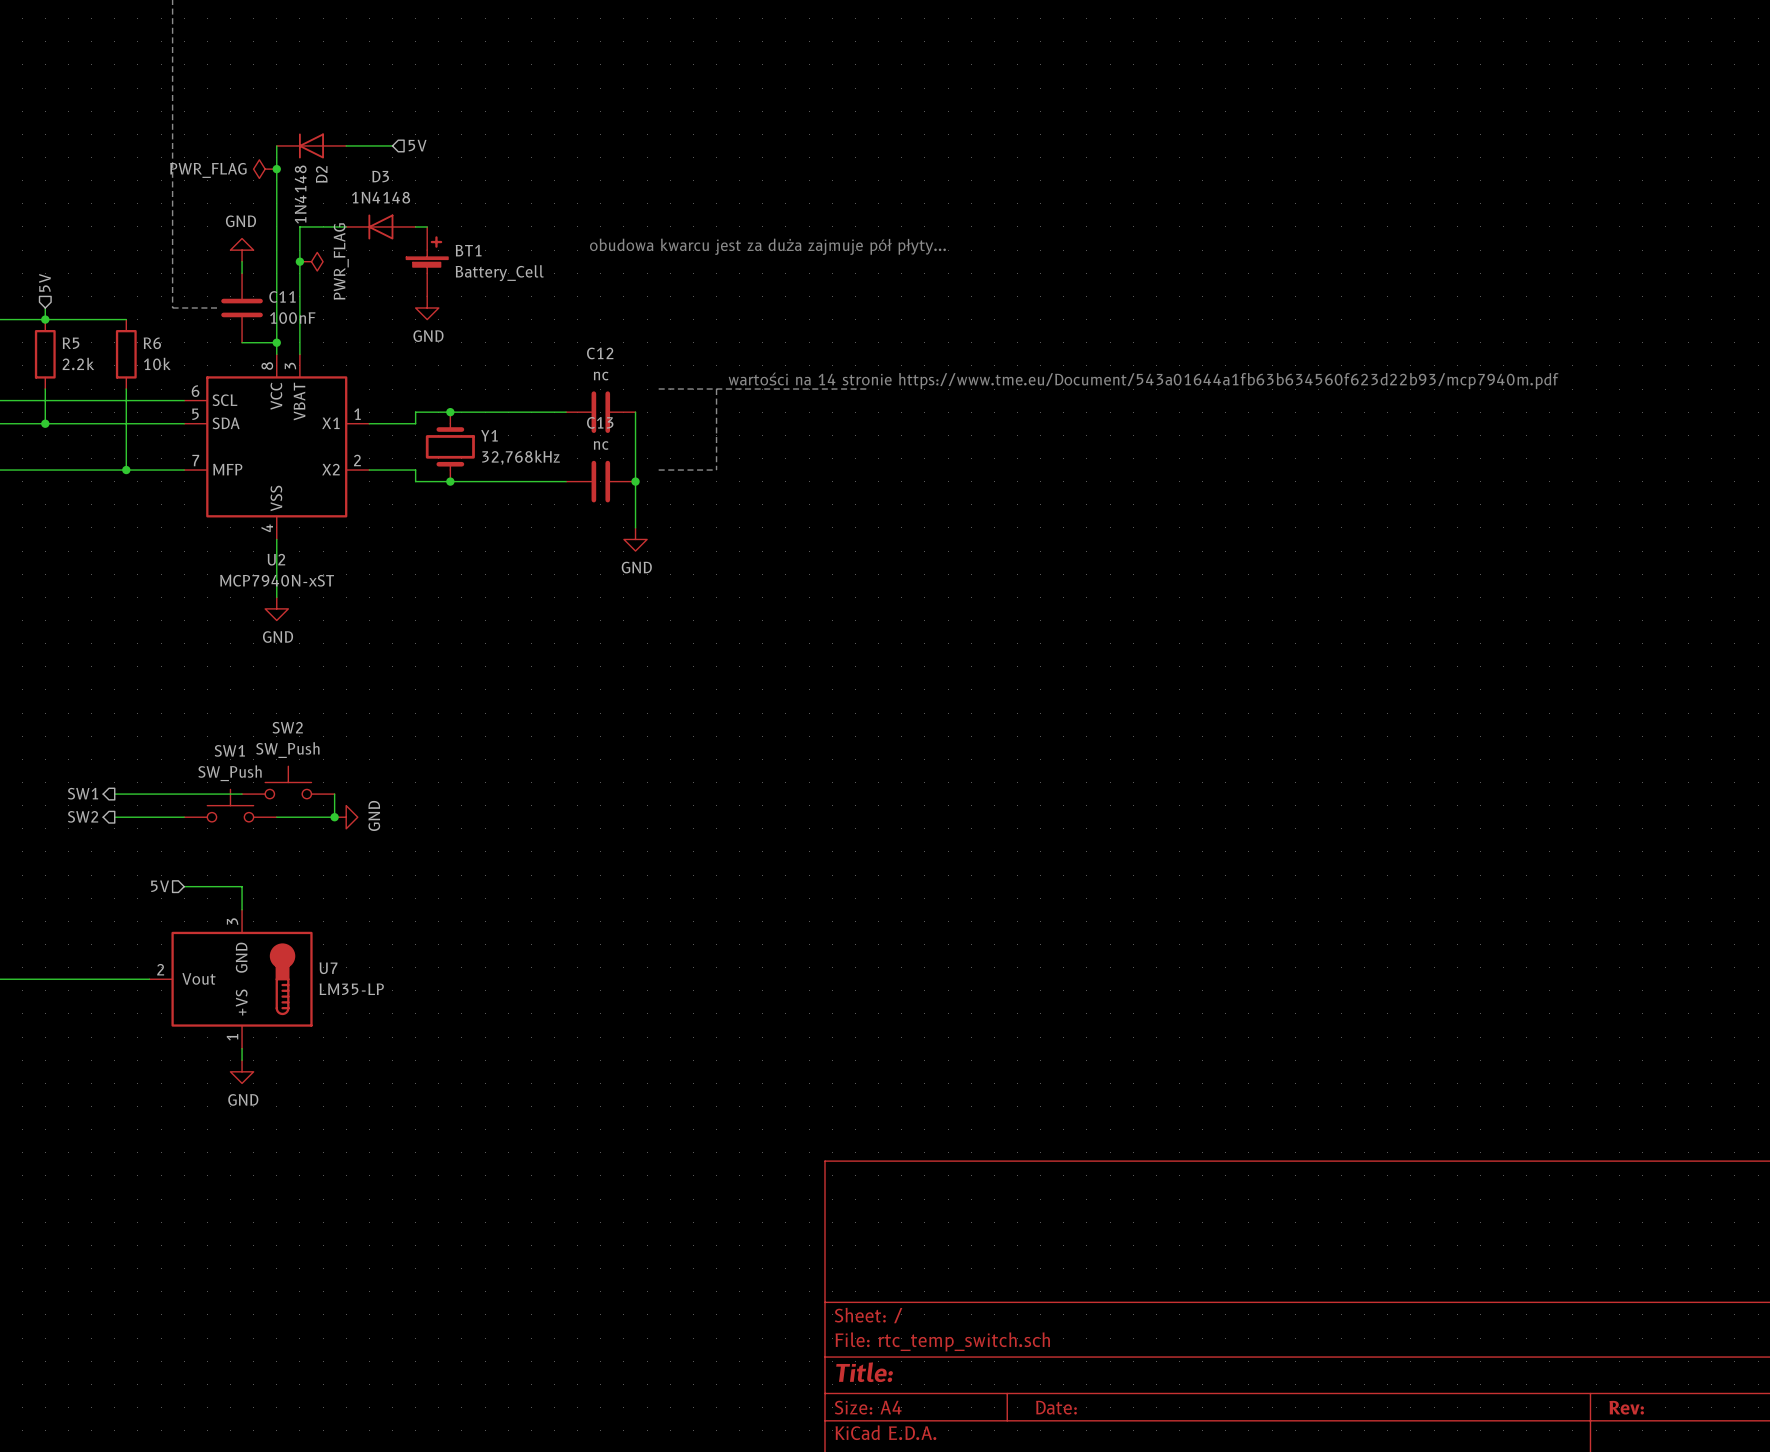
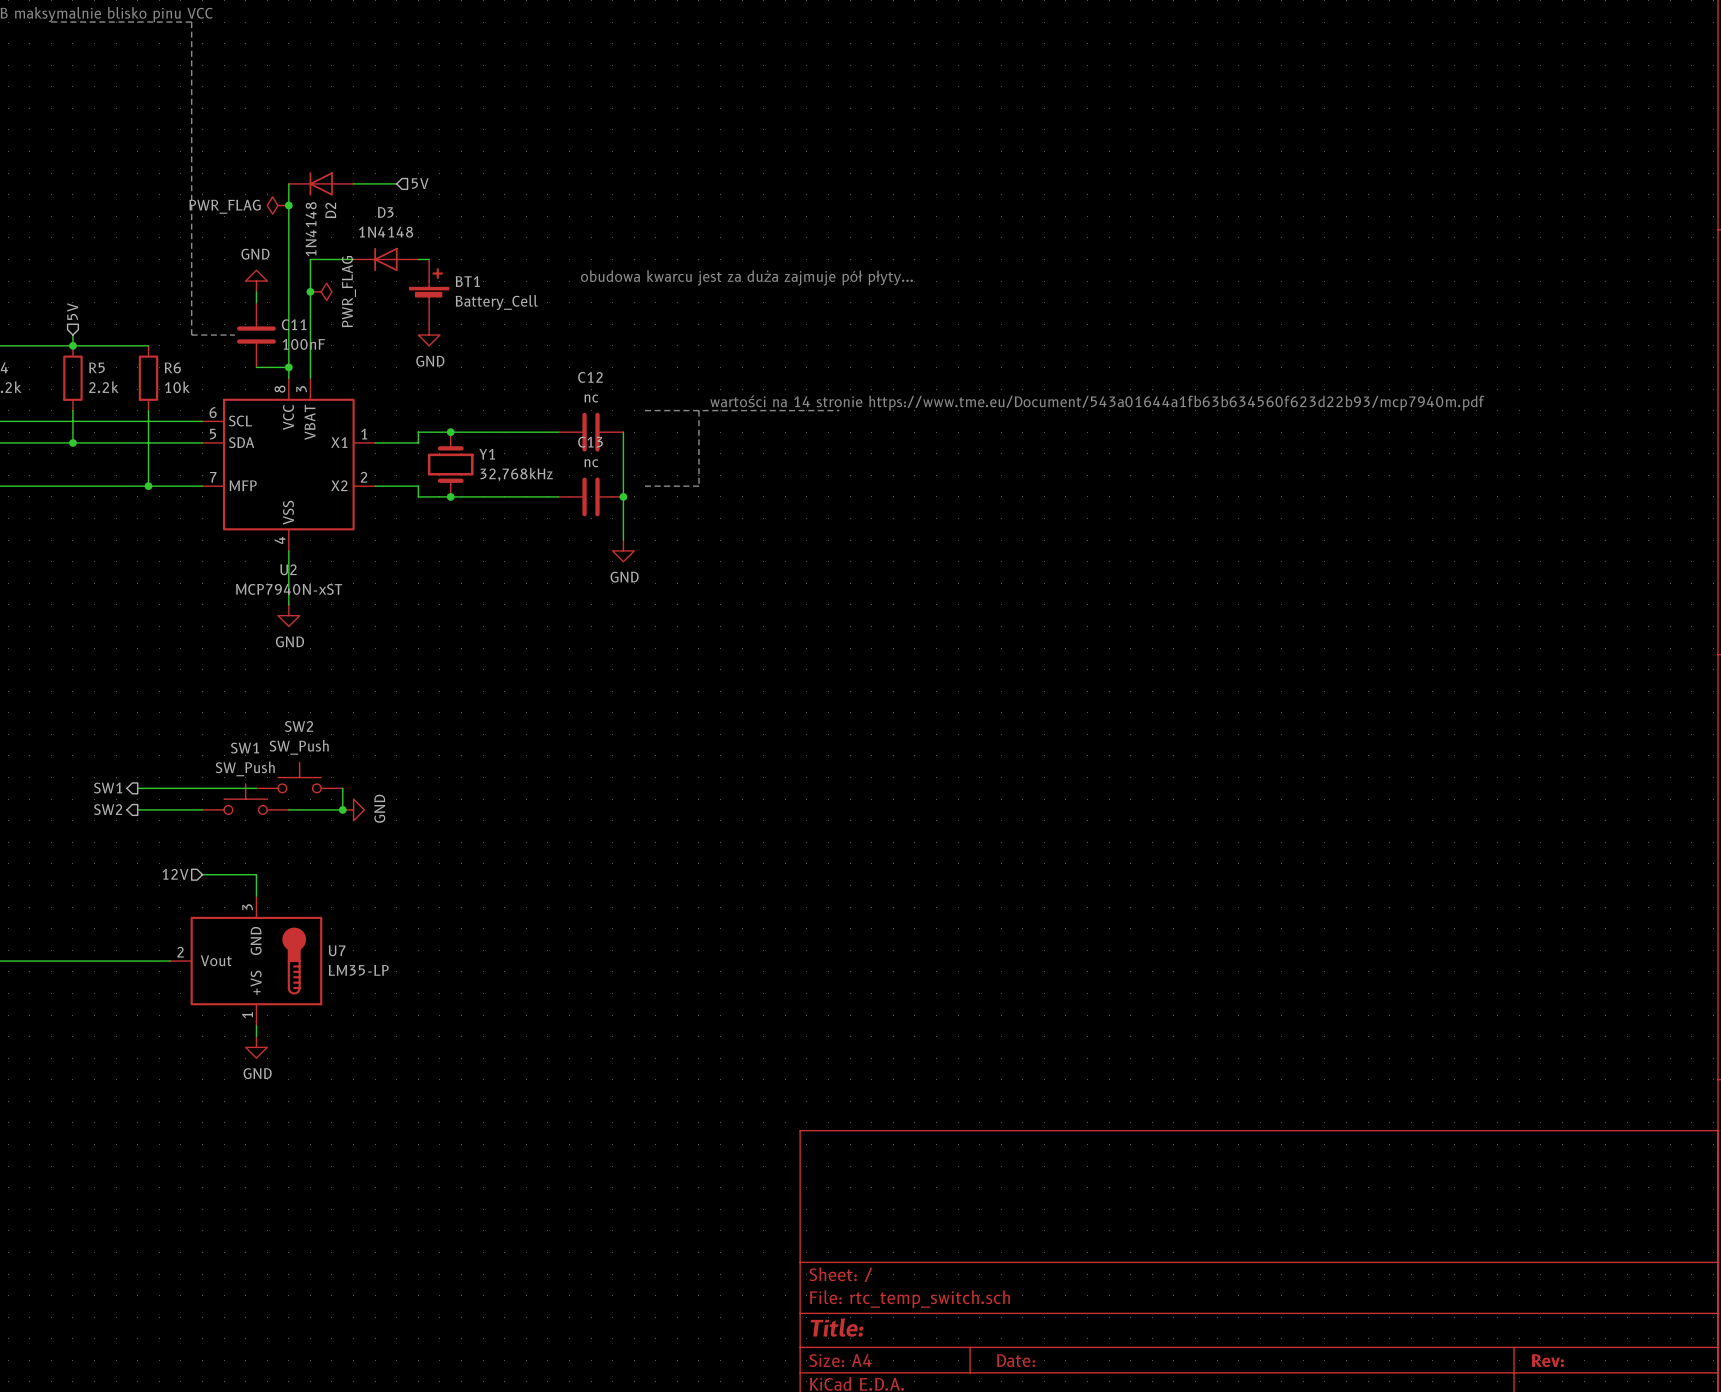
hierarchical label: 5V (160, 886) -> 12V (175, 874)

